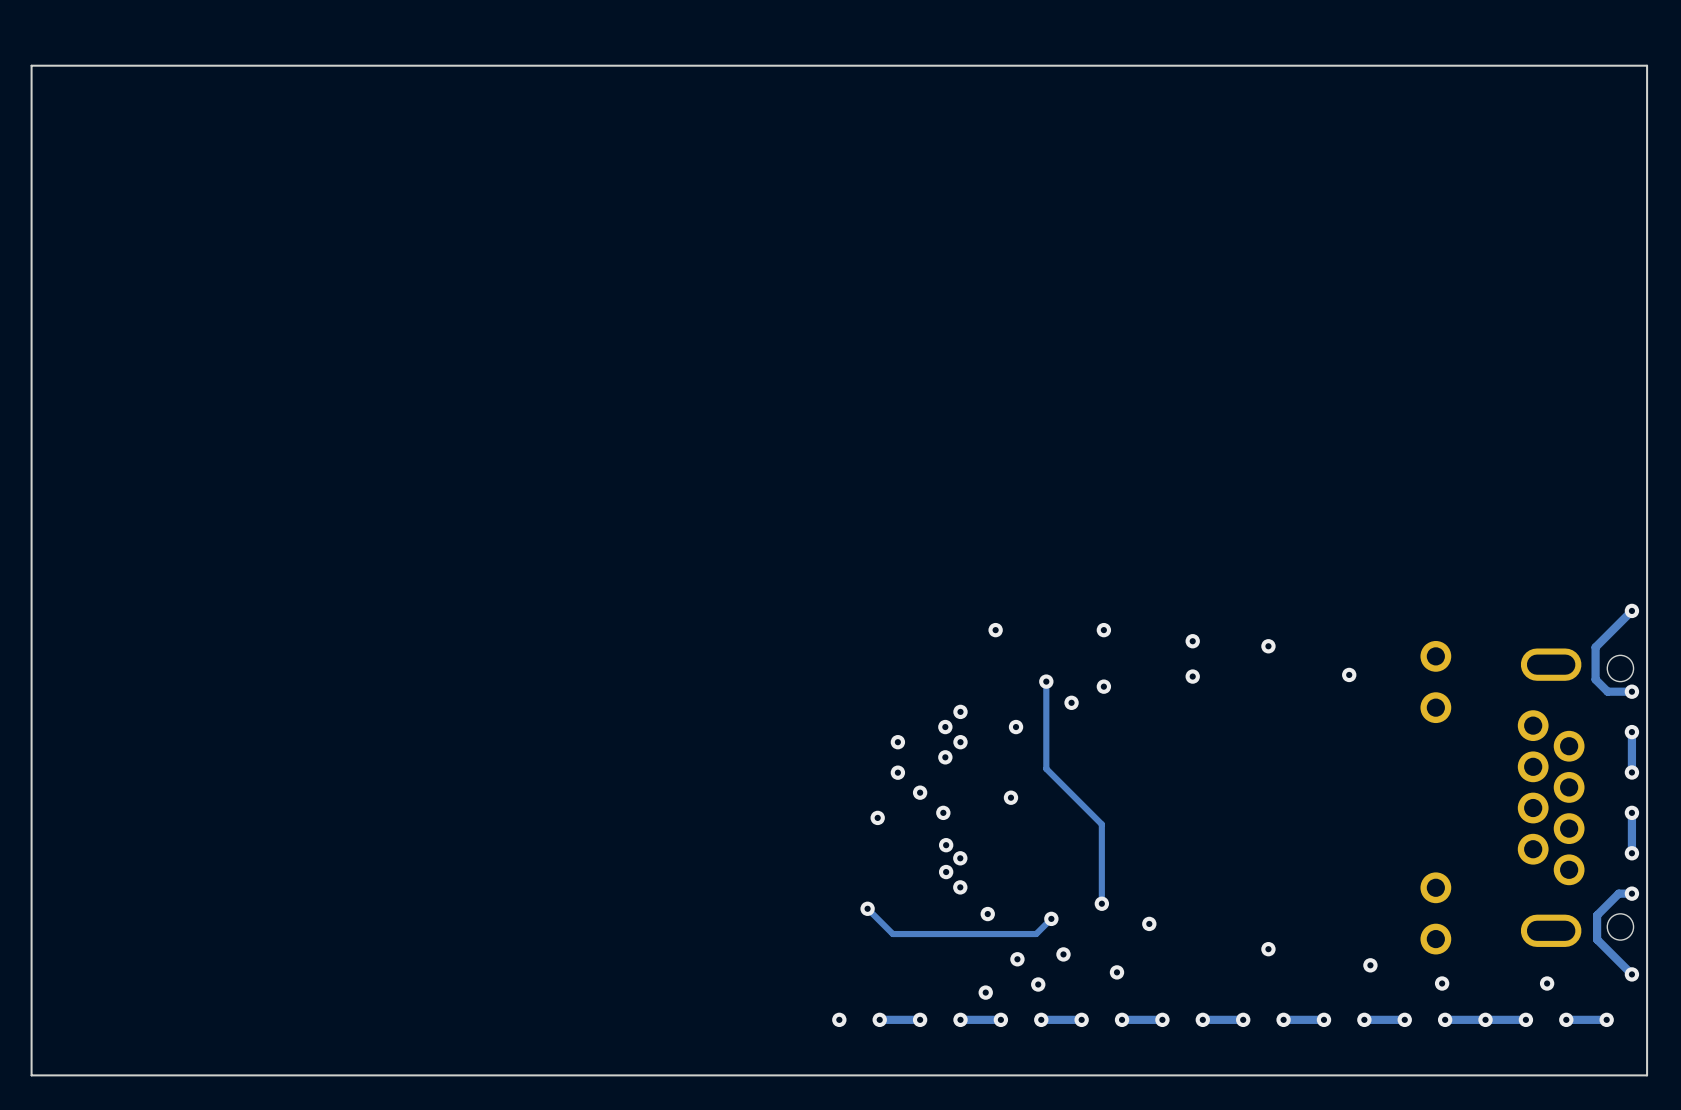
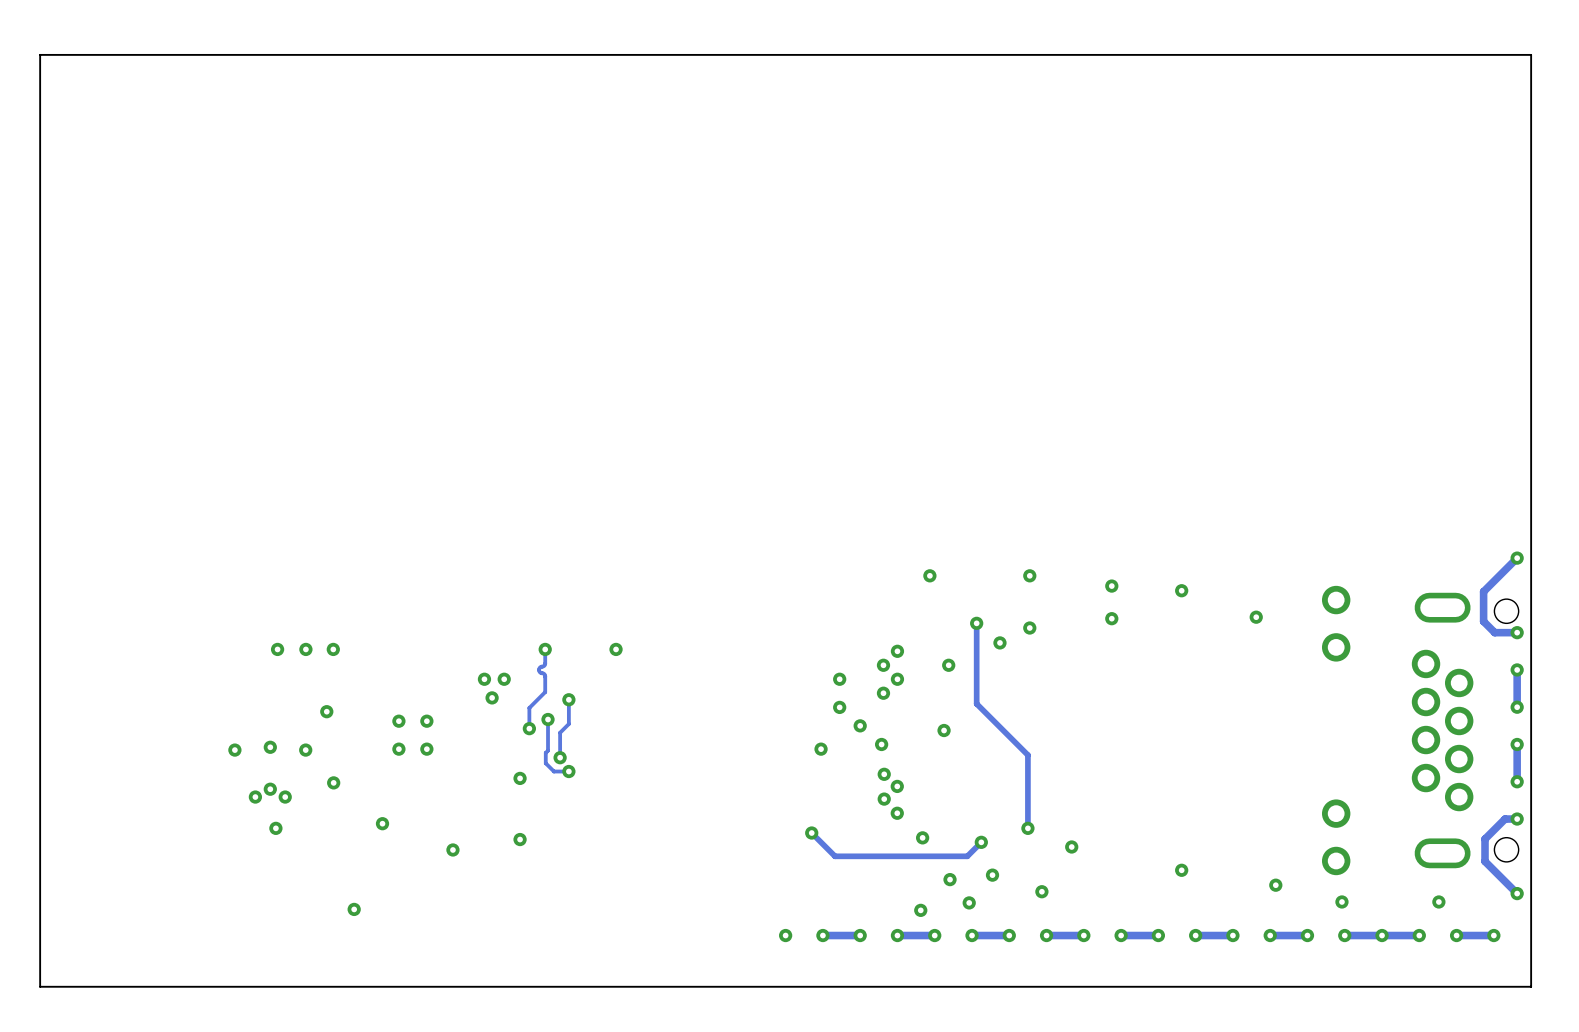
via: none -> (277, 649)
via: none -> (305, 649)
via: none -> (333, 649)
track: none -> (545, 649) (545, 664) (539, 669) (545, 675) (545, 692) (529, 707) (529, 728)
via: none -> (545, 649)
via: none -> (616, 649)
via: none -> (484, 679)
via: none -> (504, 679)
via: none -> (492, 697)
track: none -> (568, 699) (568, 723) (560, 732) (560, 757)
via: none -> (568, 699)
via: none -> (326, 711)
track: none -> (548, 719) (548, 750) (545, 752) (545, 763) (553, 771) (568, 771)
via: none -> (548, 719)
via: none -> (398, 721)
via: none -> (426, 721)
via: none -> (529, 728)
via: none -> (270, 747)
via: none -> (398, 749)
via: none -> (426, 749)
via: none -> (234, 750)
via: none -> (305, 750)
via: none -> (560, 757)
via: none -> (568, 771)
via: none -> (520, 778)
via: none -> (333, 782)
via: none -> (270, 789)
via: none -> (255, 797)
via: none -> (285, 797)
via: none -> (382, 823)
via: none -> (275, 828)
via: none -> (520, 839)
via: none -> (452, 849)
via: none -> (354, 909)

